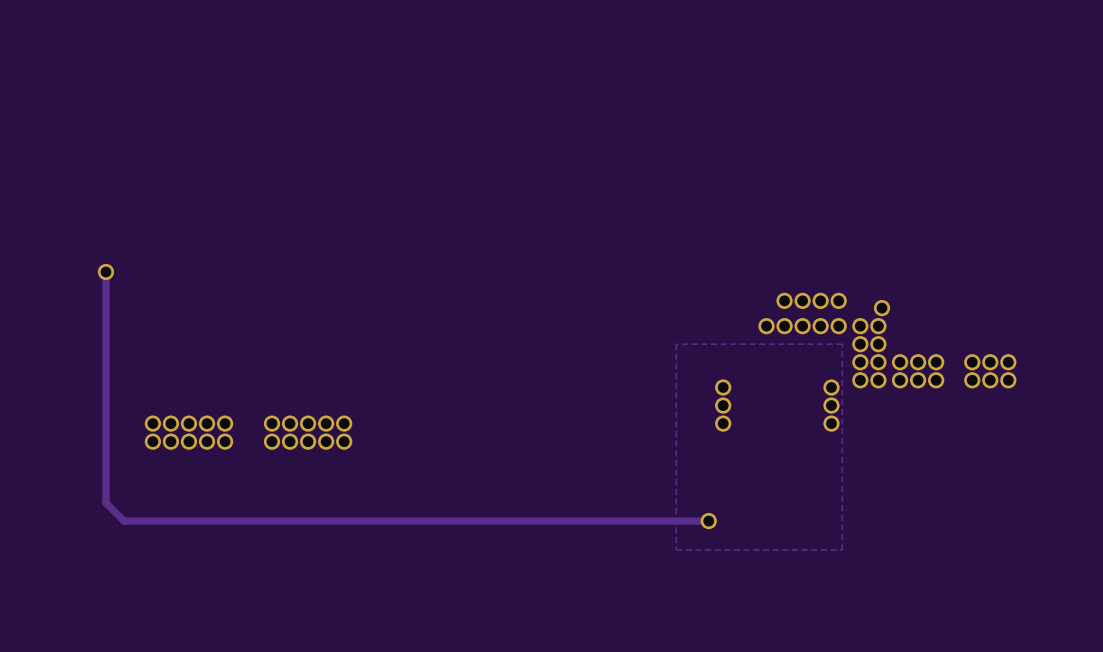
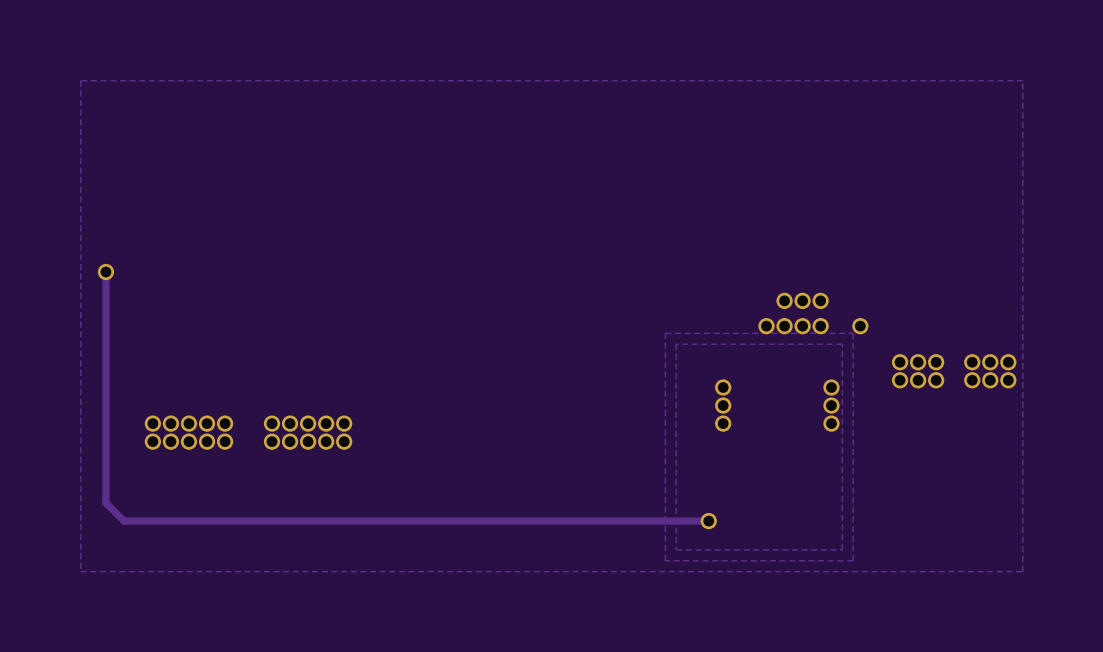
zone outline: none -> (1022, 80) (1022, 571) (80, 571) (80, 80) (1022, 80)
via: (838, 300) -> none
via: (882, 308) -> none
via: (838, 326) -> none
via: (878, 326) -> none
zone outline: none -> (853, 333) (853, 560) (665, 560) (665, 333) (853, 333)
via: (860, 344) -> none
via: (878, 344) -> none
via: (860, 362) -> none
via: (878, 362) -> none
via: (860, 380) -> none
via: (878, 380) -> none

